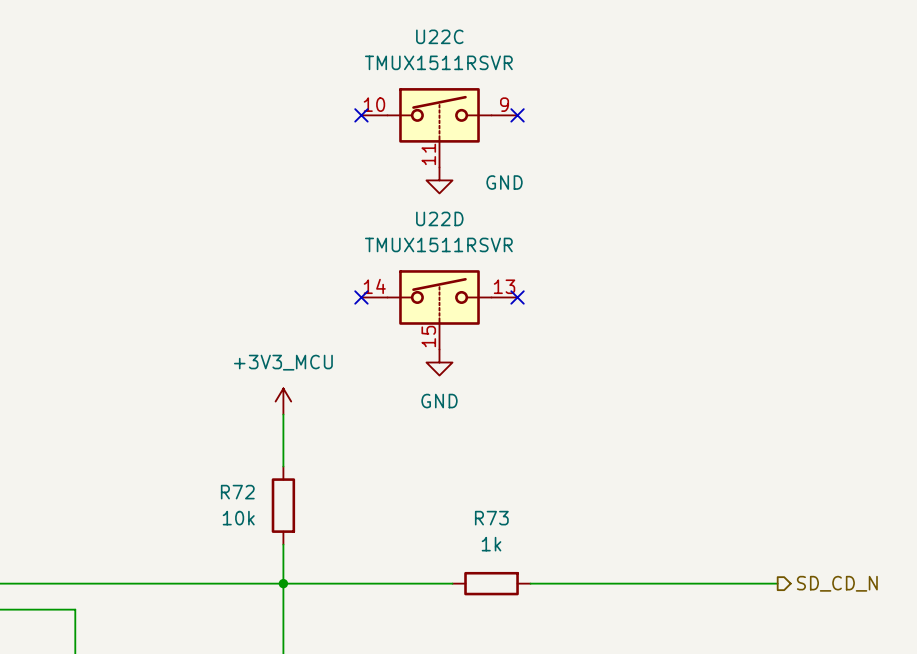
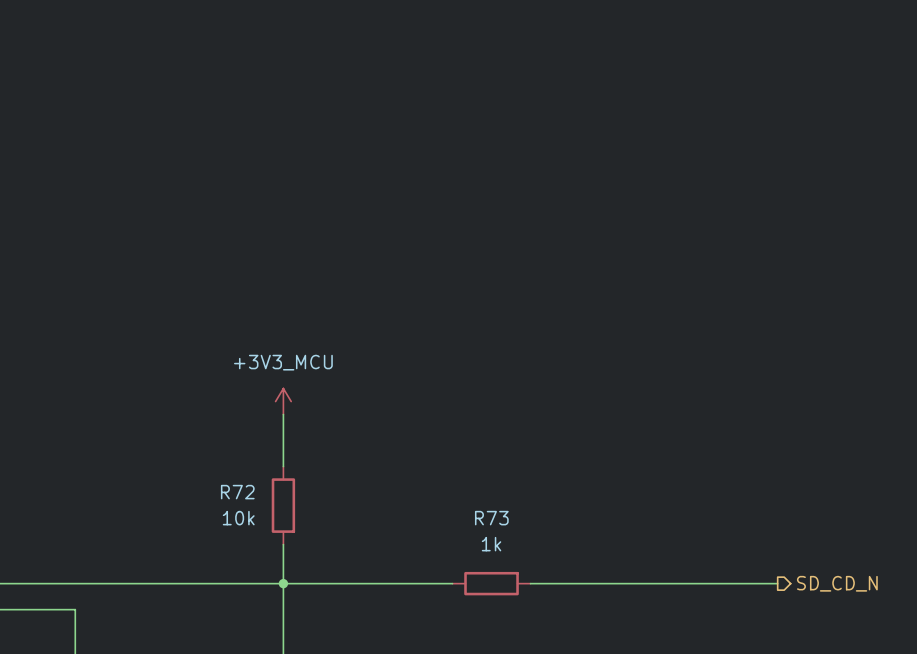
no-connect mark: (361, 115) -> none
no-connect mark: (517, 115) -> none
U22C: TMUX1511RSVR (439, 127) -> none
power symbol: GND (439, 180) -> none
no-connect mark: (361, 297) -> none
no-connect mark: (517, 297) -> none
U22D: TMUX1511RSVR (439, 309) -> none
power symbol: GND (439, 362) -> none

